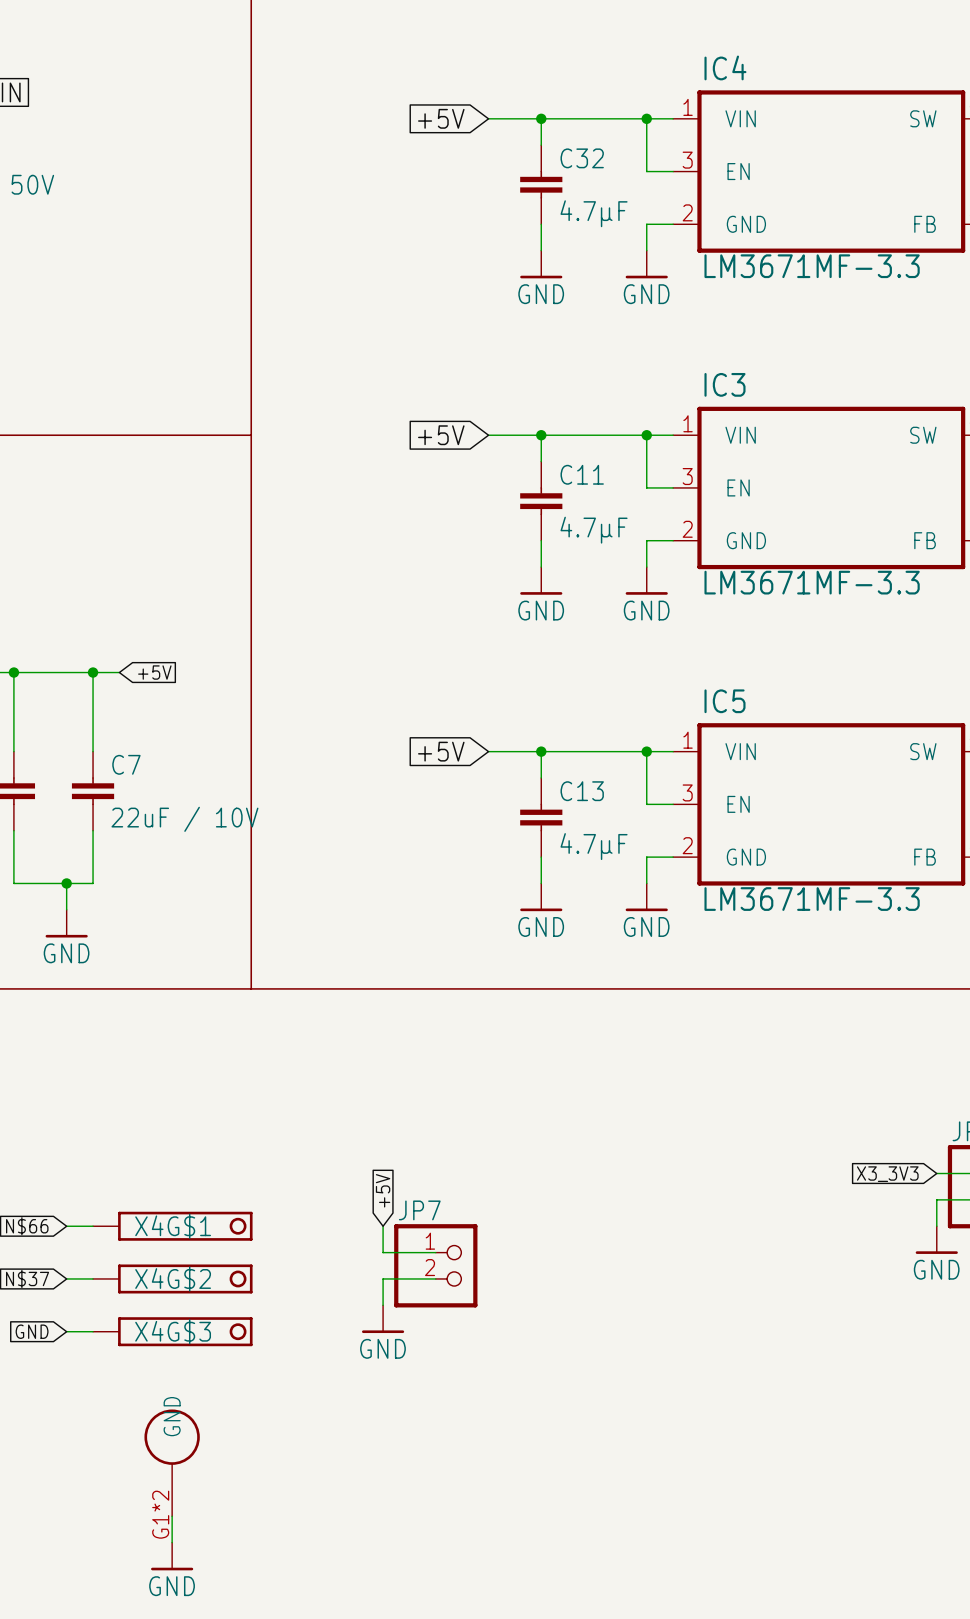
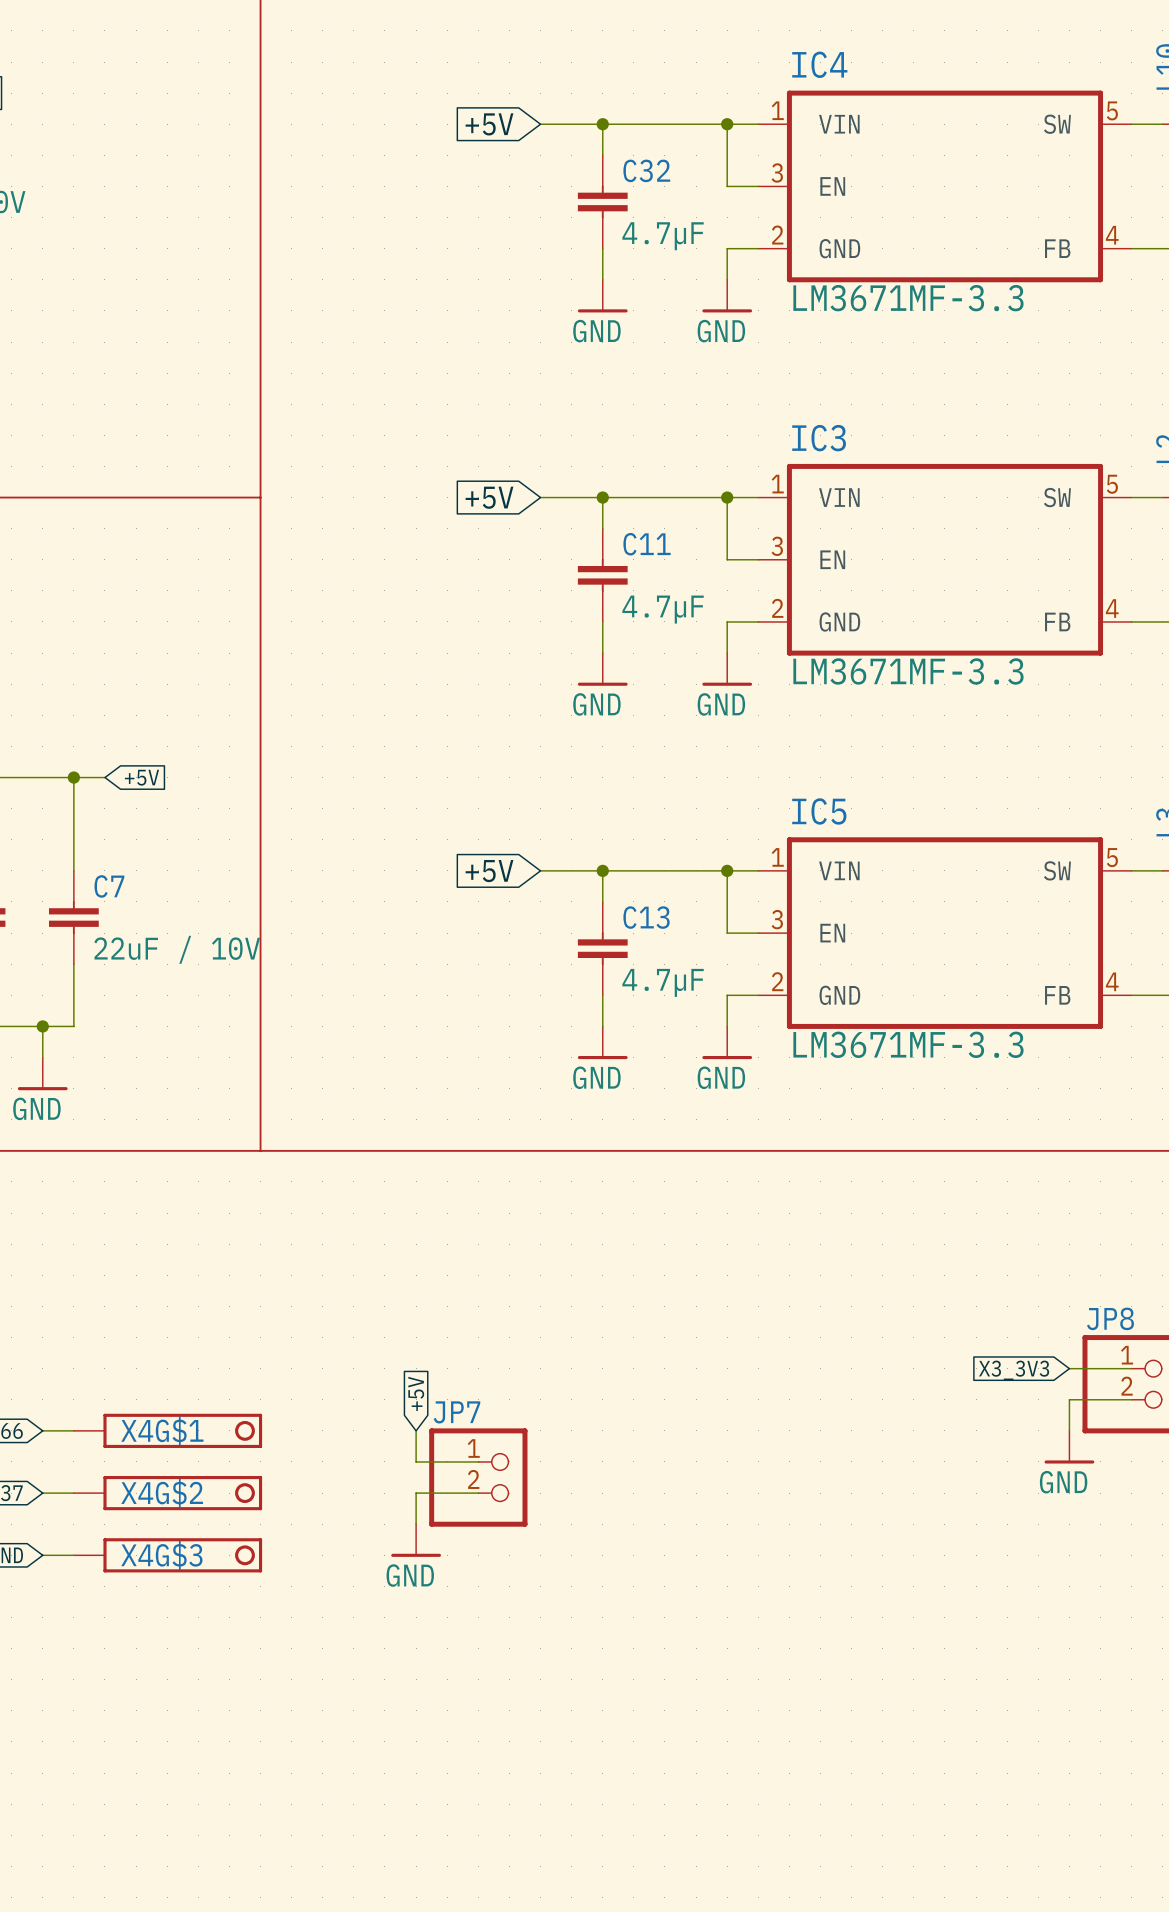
part: (172, 1462) -> none
wire: (172, 1516) (172, 1542) -> none
power symbol: GND (172, 1556) -> none

